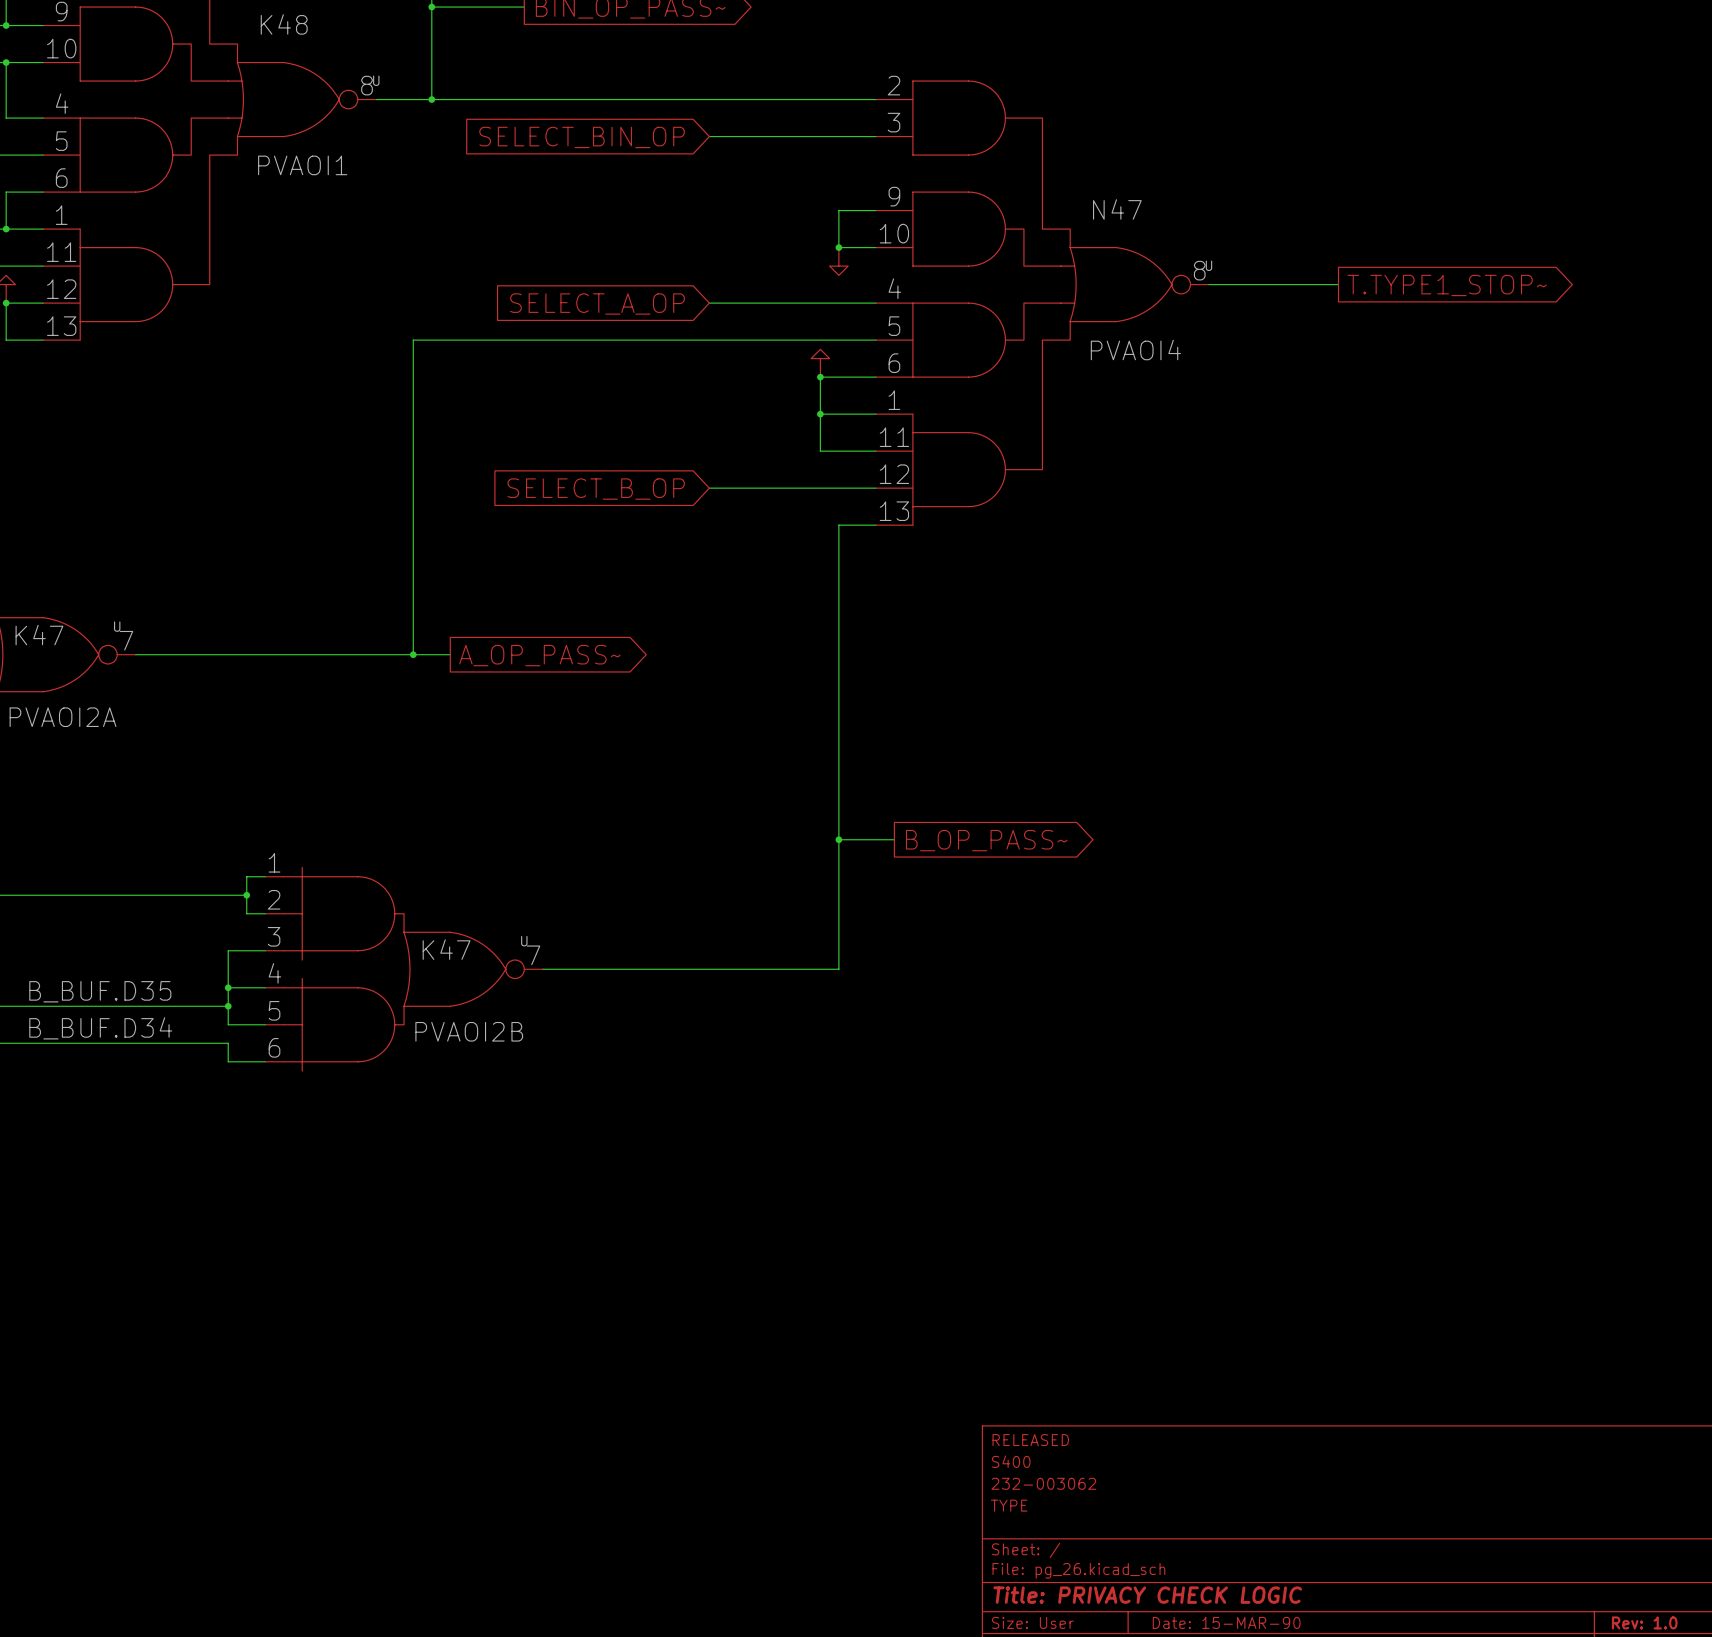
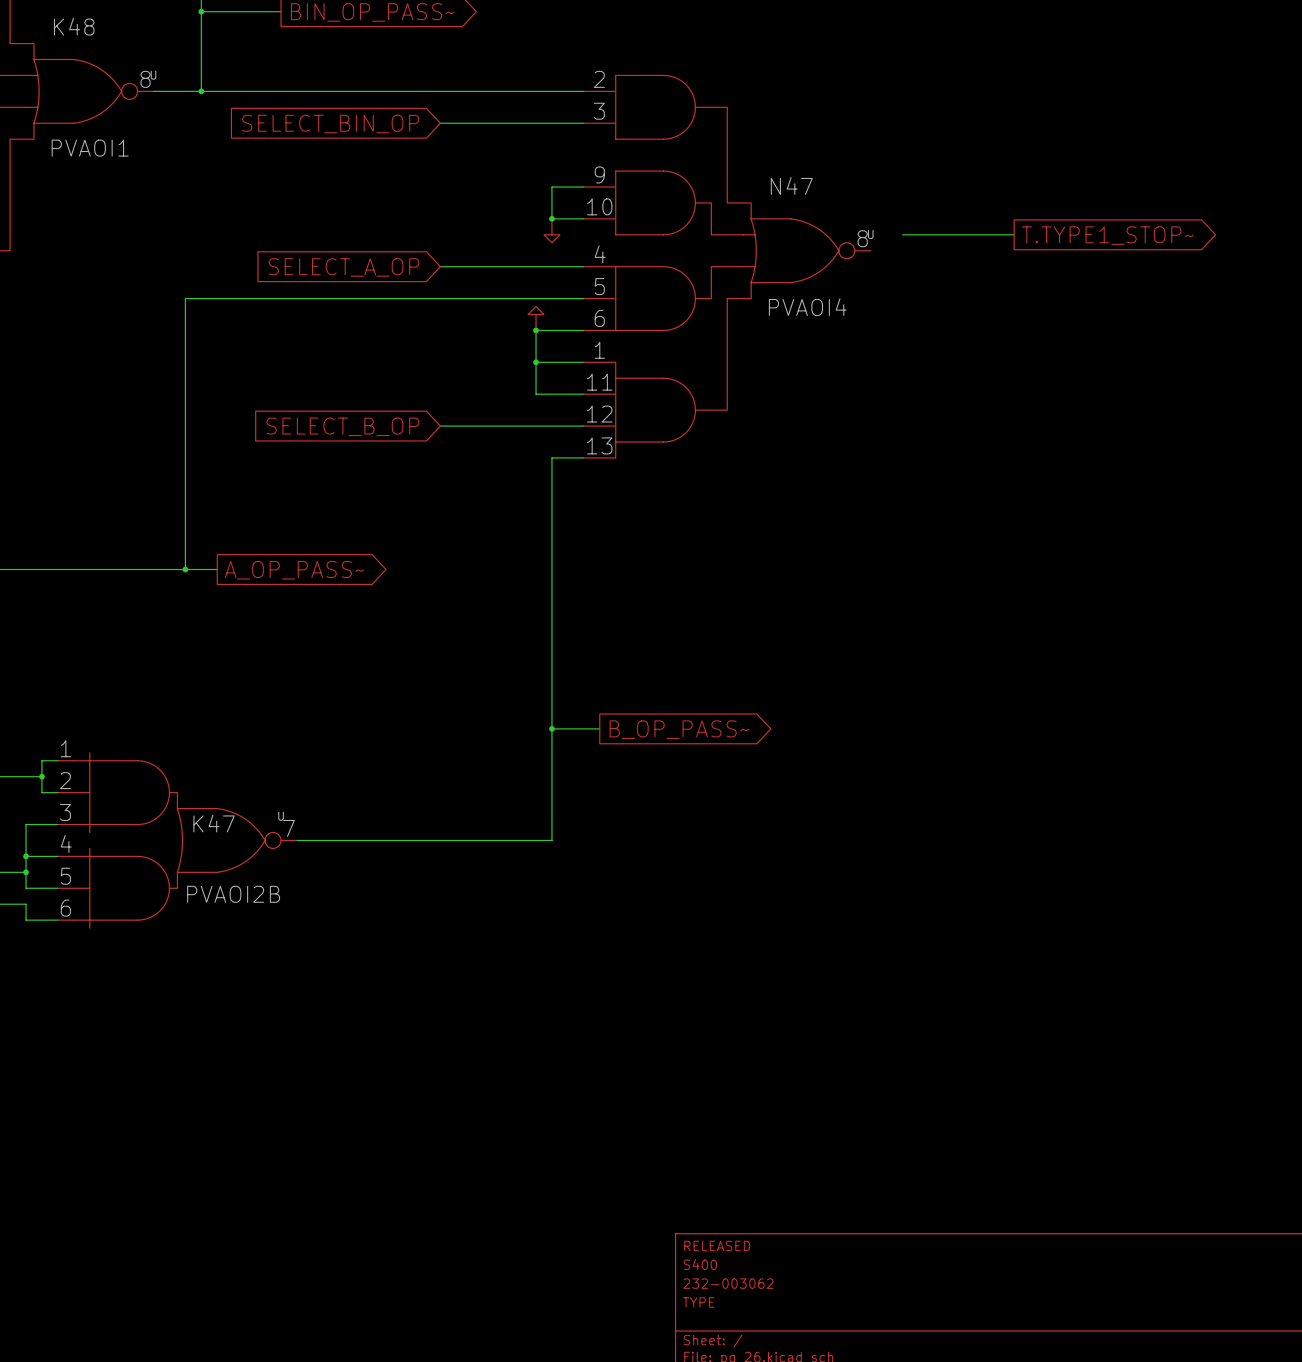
wire: (1208, 284) (1338, 284) -> (902, 234) (1014, 234)
global label position: T.TYPE1_STOP~ (1447, 285) -> T.TYPE1_STOP~ (1107, 235)

